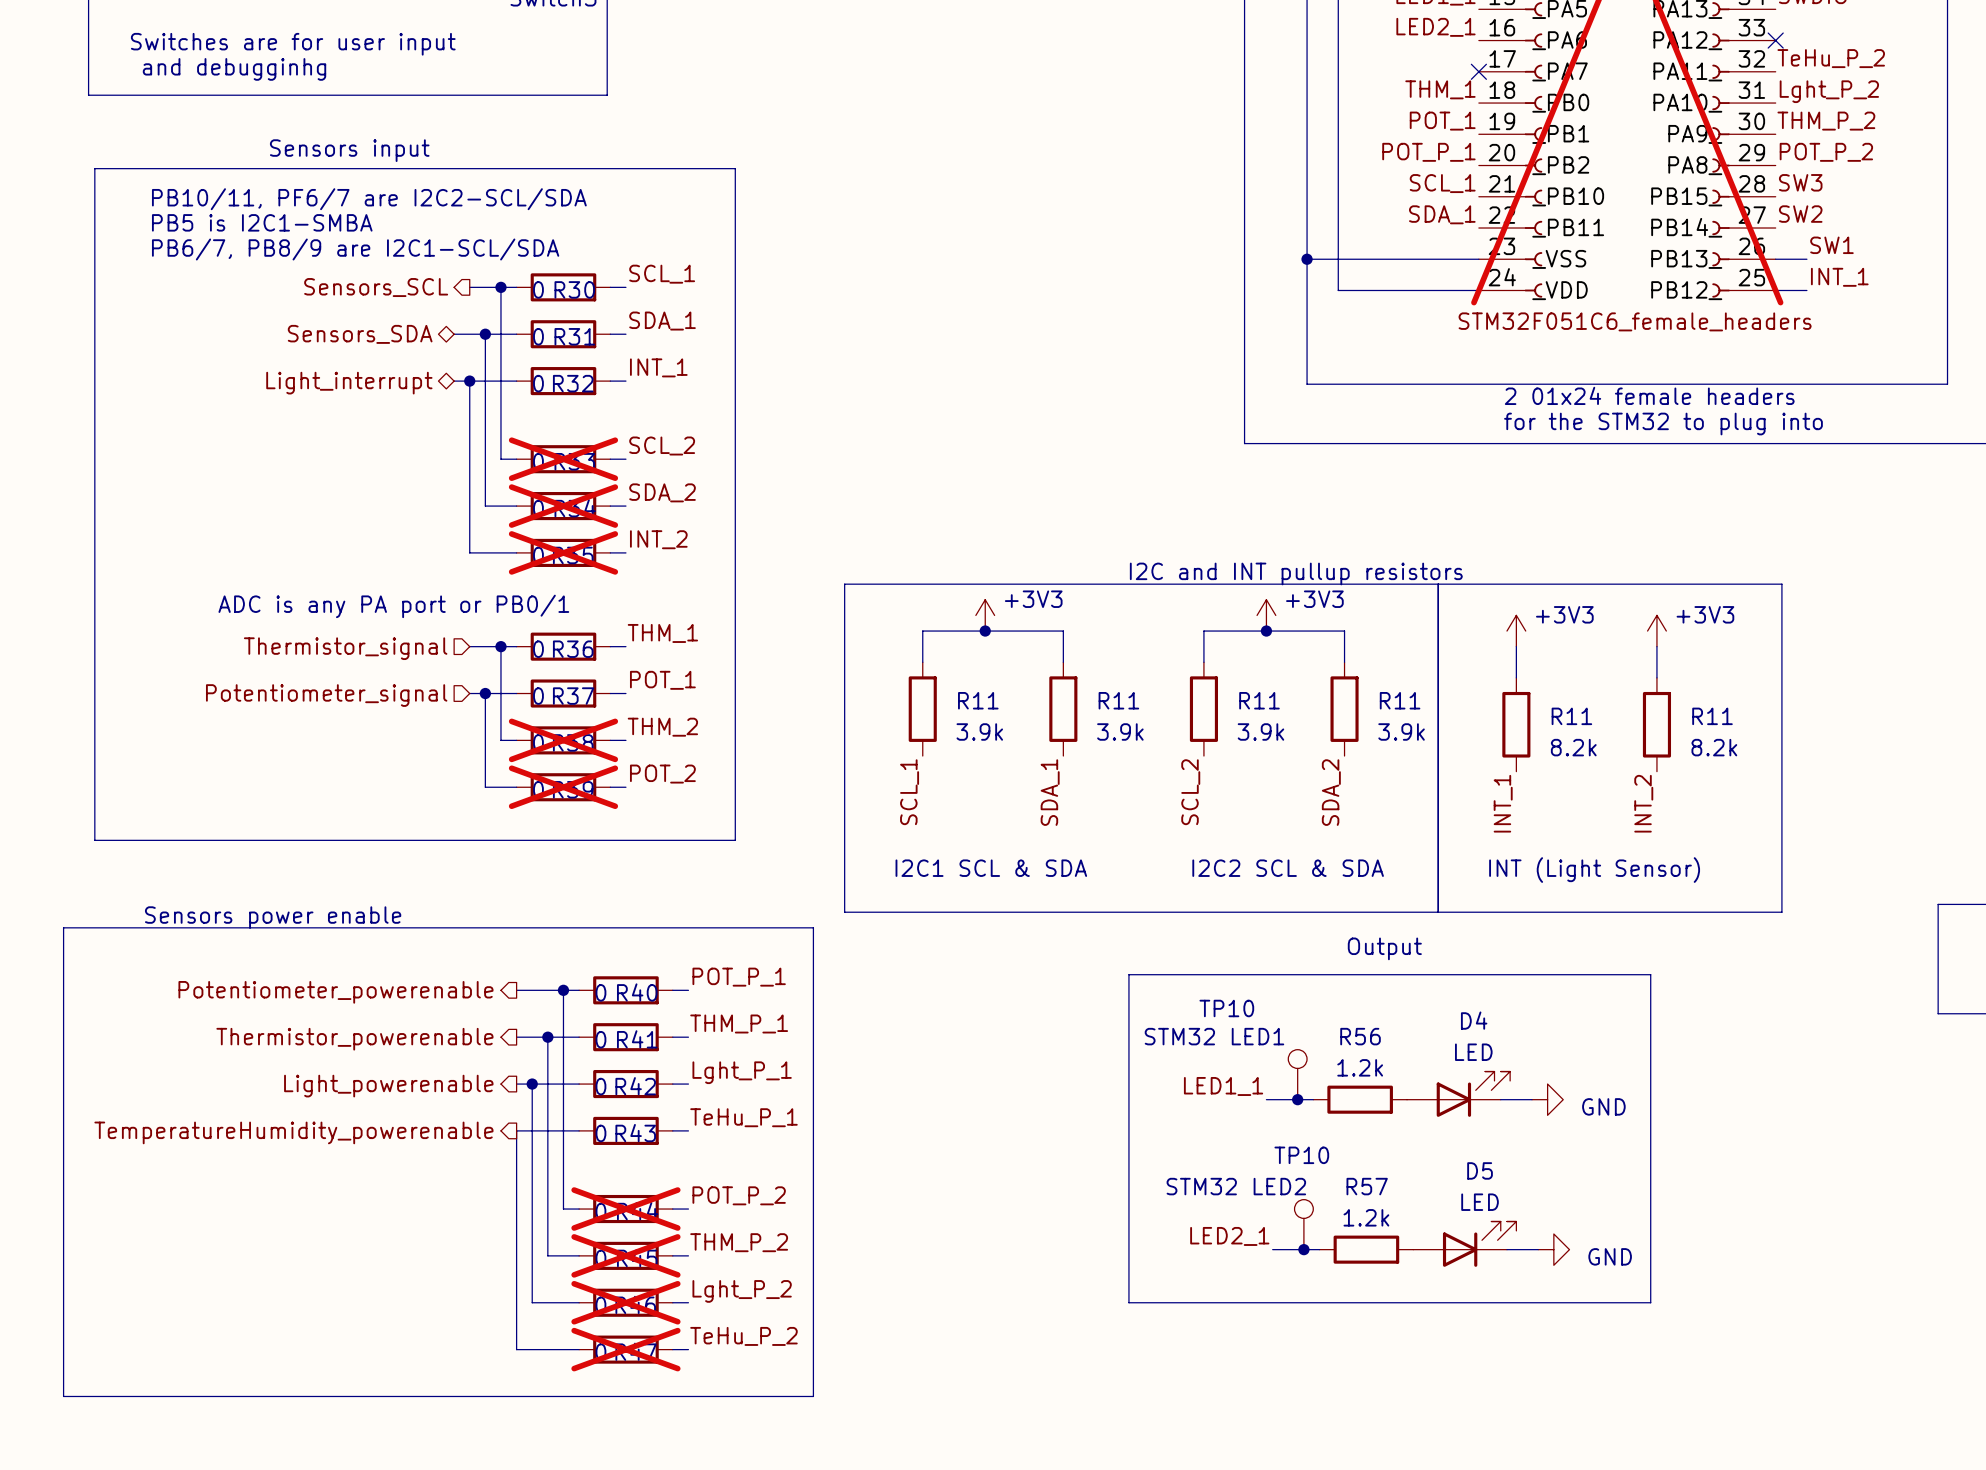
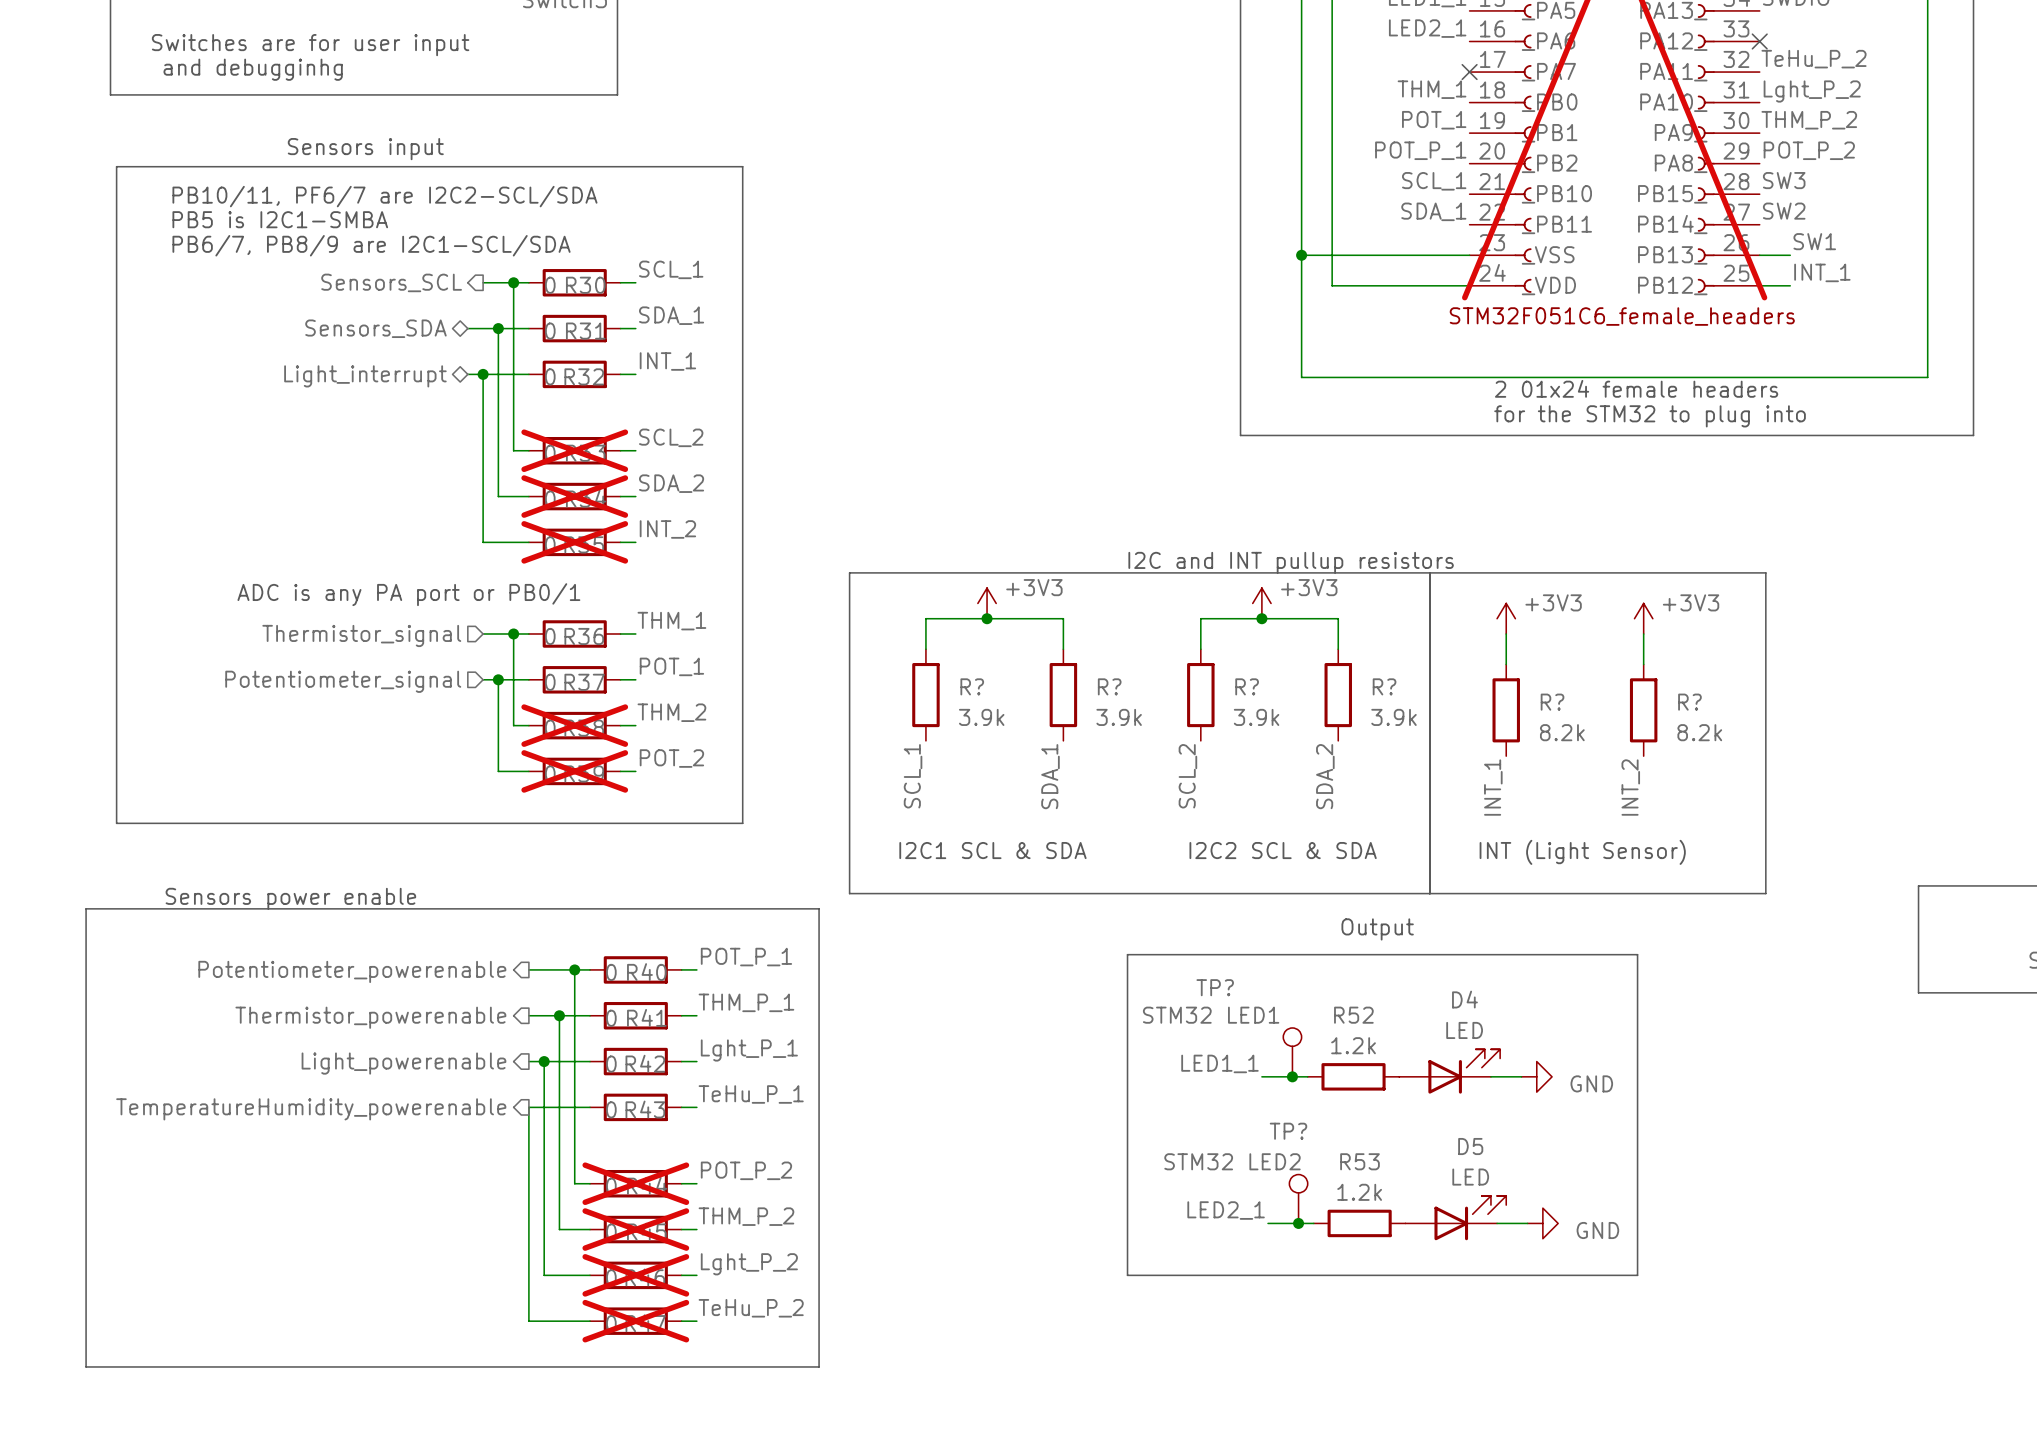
R11 name: R11 (978, 700) -> R? (972, 686)
R11 name: R11 (1118, 700) -> R? (1109, 686)
R11 name: R11 (1259, 700) -> R? (1247, 686)
R11 name: R11 (1400, 700) -> R? (1384, 686)
R11 name: R11 (1571, 716) -> R? (1552, 702)
R11 name: R11 (1712, 716) -> R? (1689, 702)
TP10 name: TP10 (1226, 1008) -> TP? (1215, 987)
R56 name: R56 (1360, 1036) -> R52 (1353, 1015)
TP10 name: TP10 (1301, 1155) -> TP? (1288, 1131)
R57 name: R57 (1367, 1186) -> R53 (1360, 1161)

